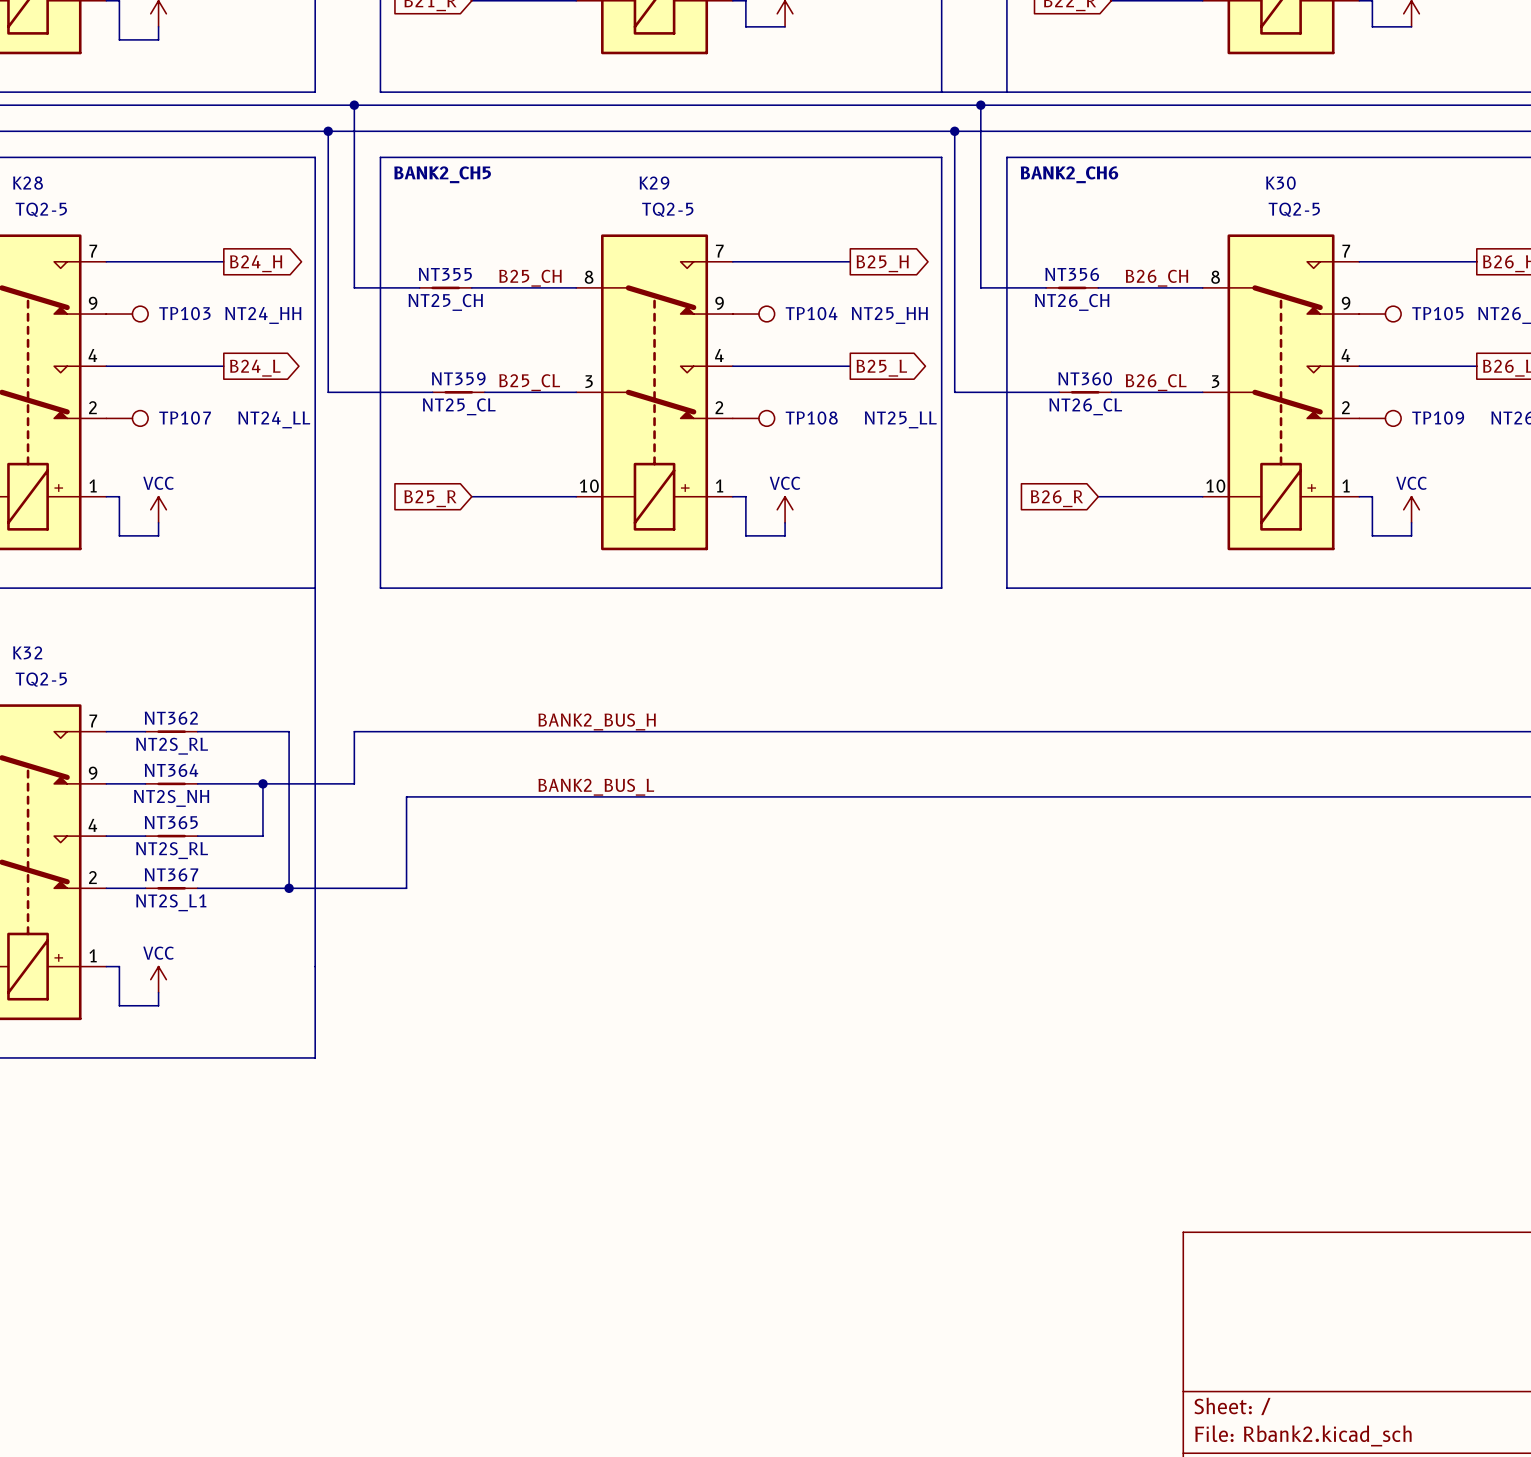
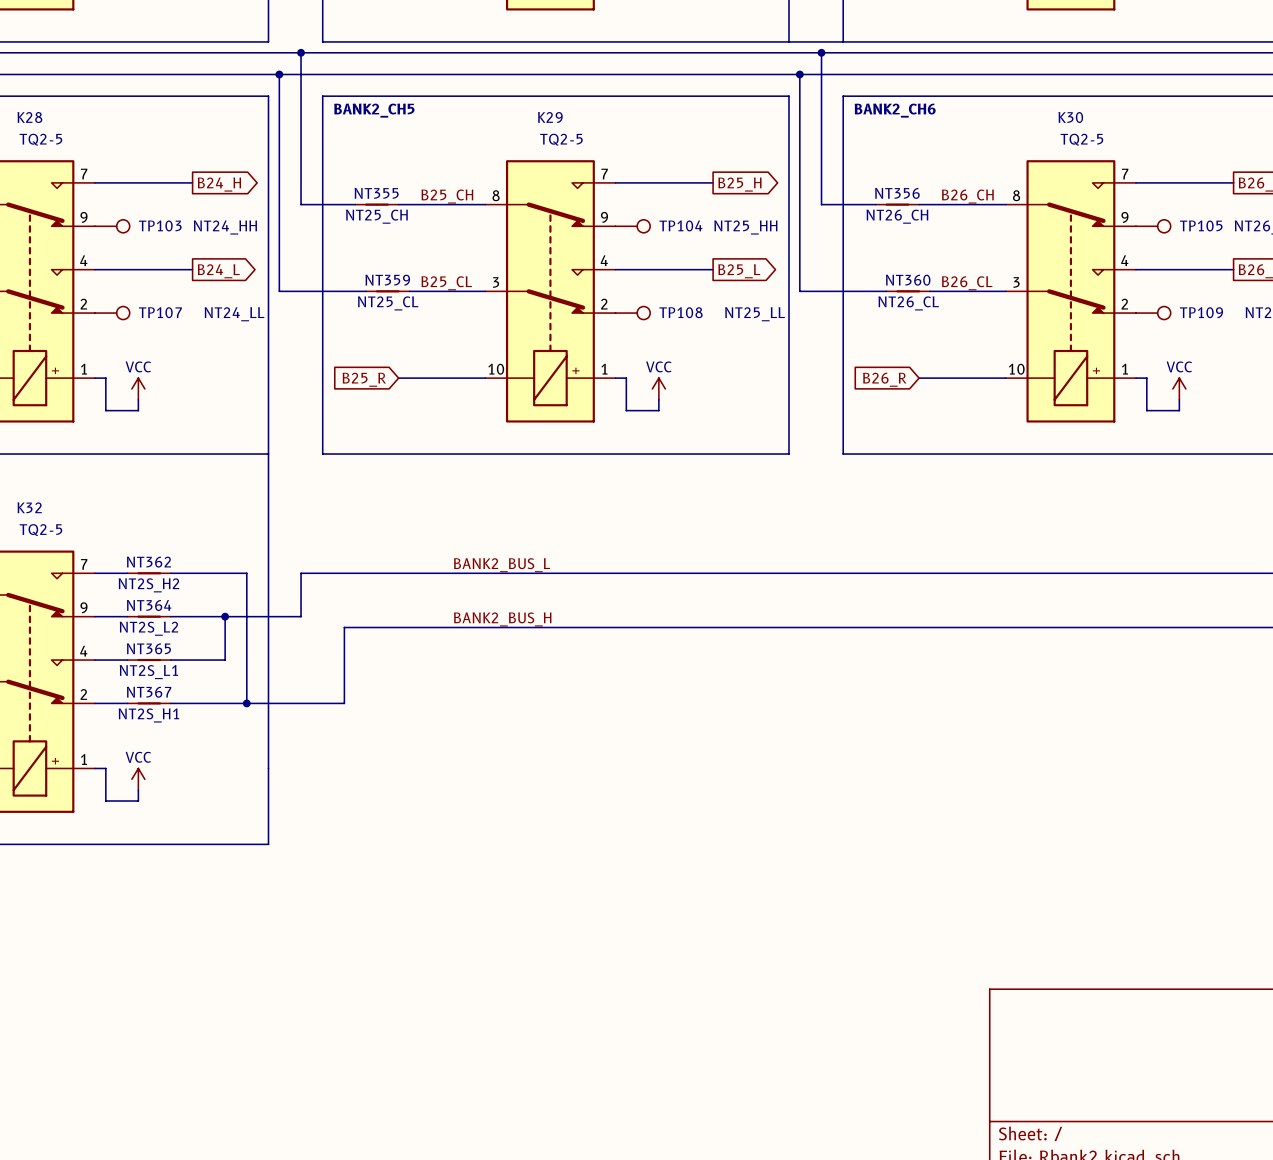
label: BANK2_BUS_H (597, 721) -> BANK2_BUS_L (502, 565)
NT362 value: NT2S_RL (172, 746) -> NT2S_H2 (148, 585)
label: BANK2_BUS_L (596, 787) -> BANK2_BUS_H (502, 619)
NT364 value: NT2S_NH (171, 798) -> NT2S_L2 (148, 628)
NT365 value: NT2S_RL (172, 850) -> NT2S_L1 (148, 672)
NT367 value: NT2S_L1 (171, 902) -> NT2S_H1 (148, 715)

